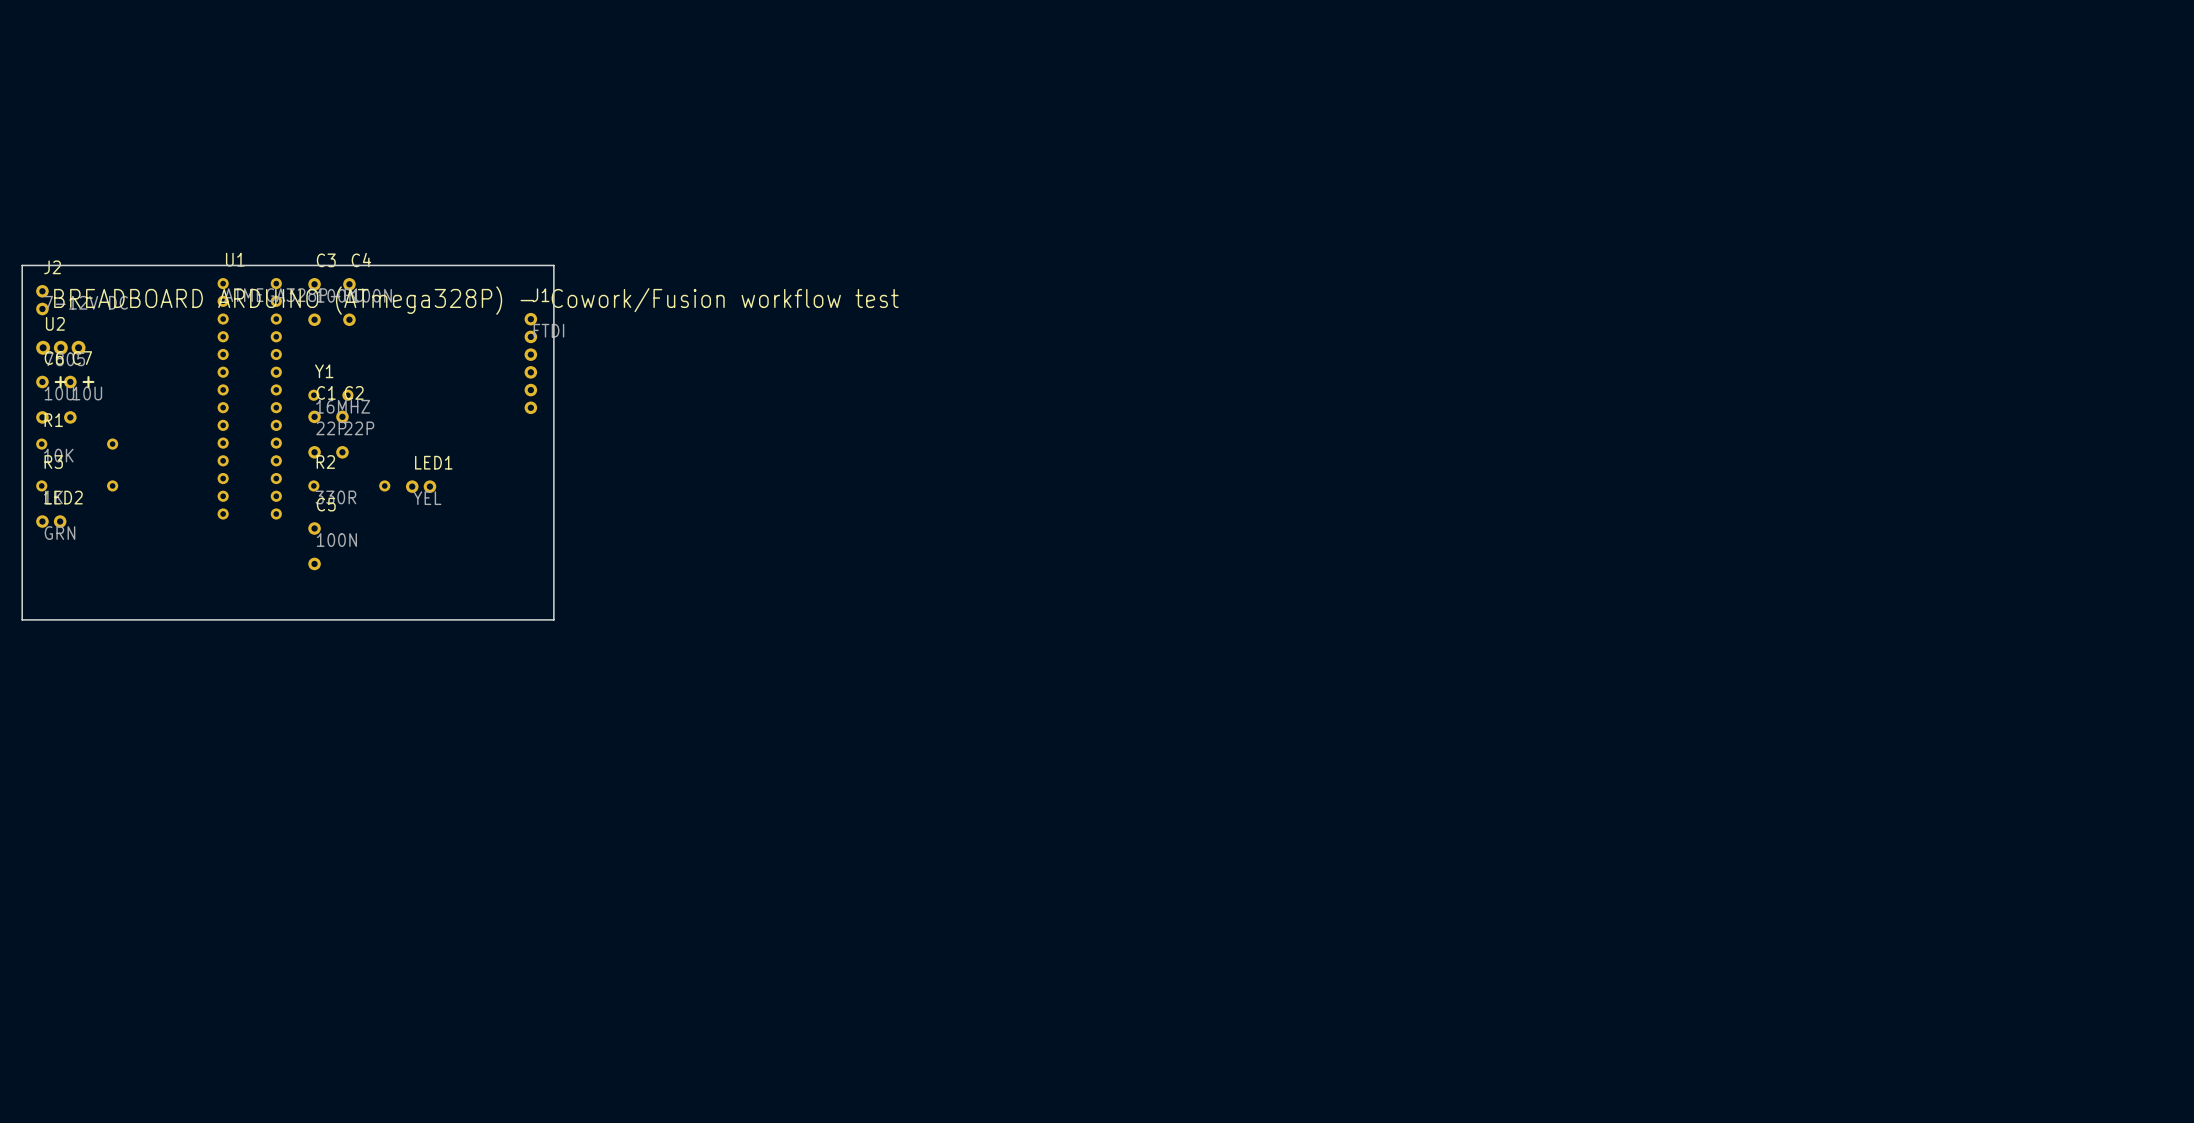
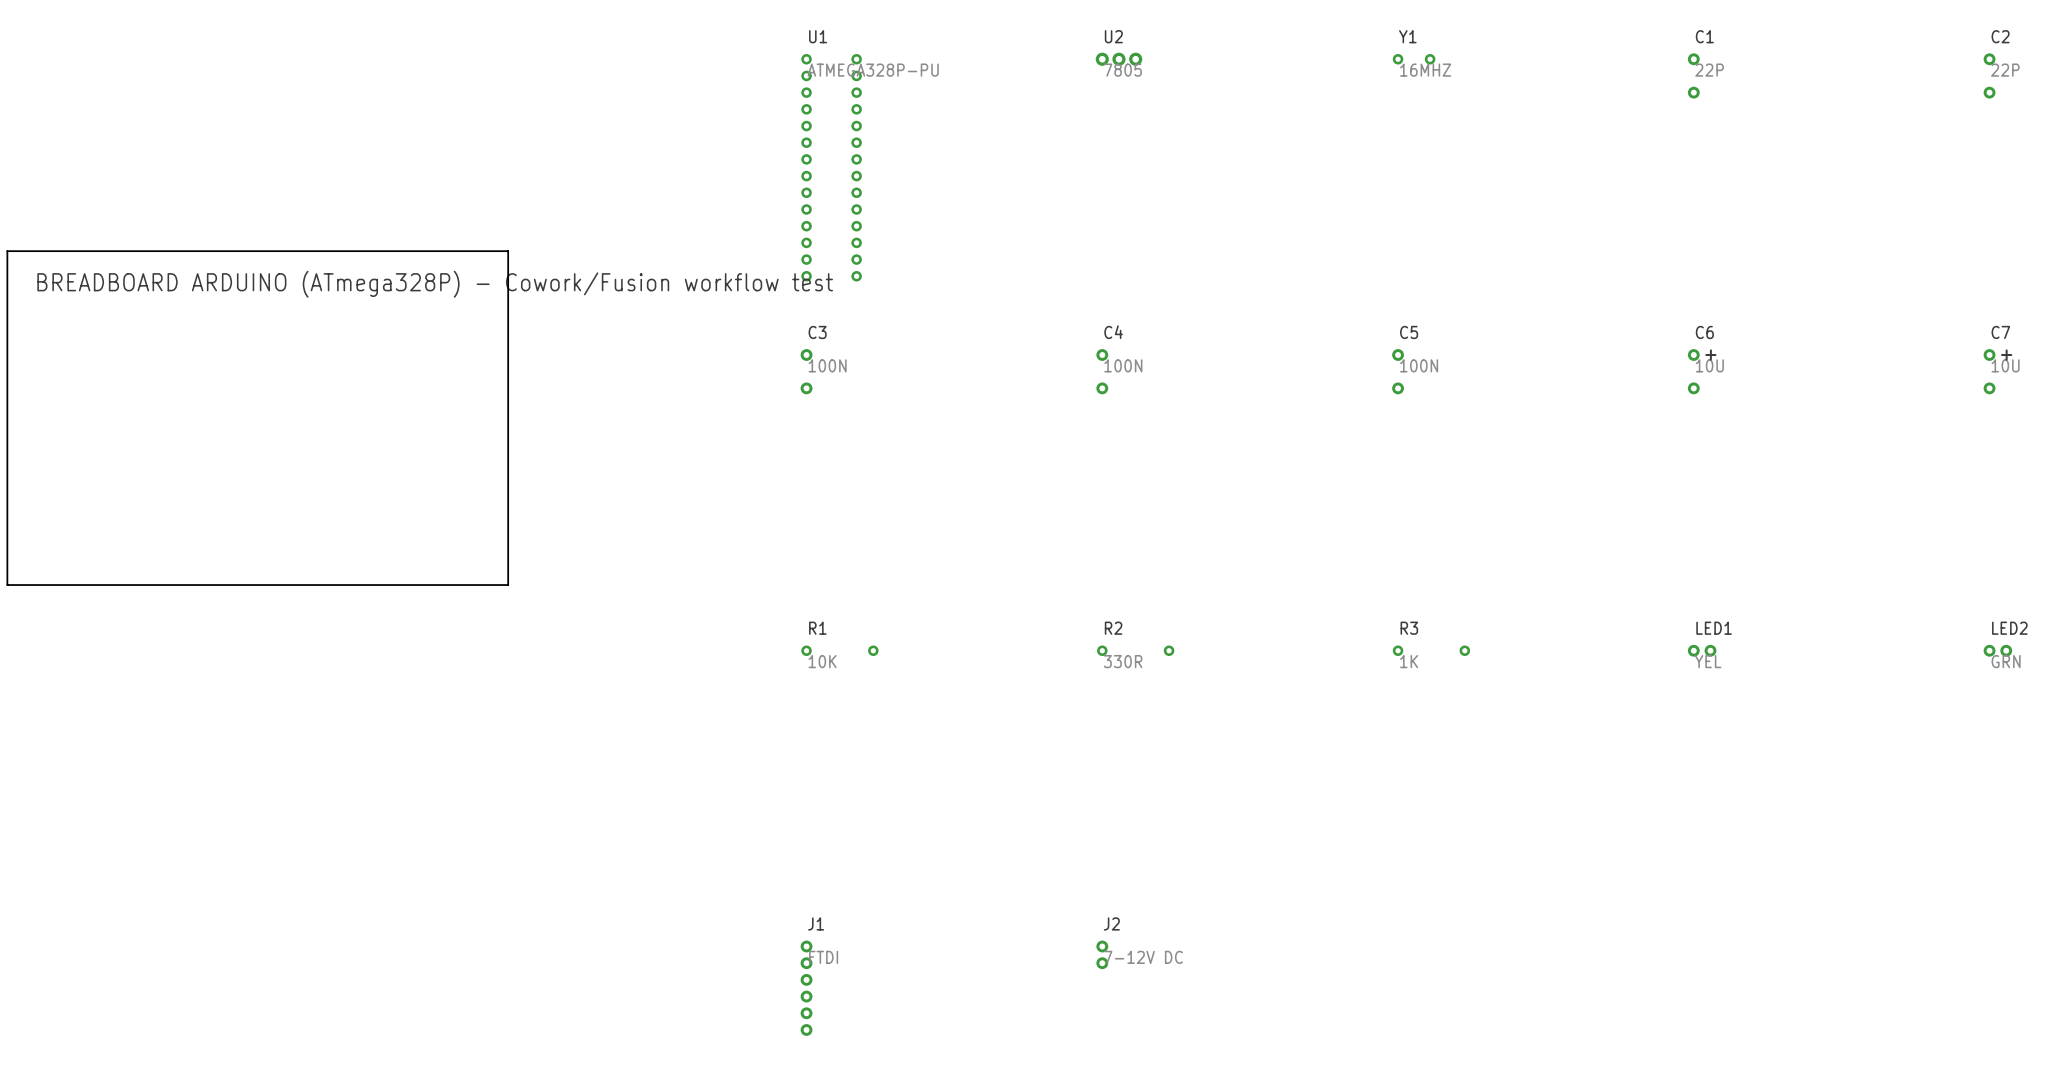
J2 position: (42, 300) -> (1102, 954)
C3 position: (314, 302) -> (806, 371)
C4 position: (349, 302) -> (1102, 371)
U2 position: (60, 347) -> (1118, 59)
J1 position: (530, 363) -> (806, 988)
Y1 position: (330, 395) -> (1414, 59)
U1 position: (249, 398) -> (831, 167)
C6 position: (51, 399) -> (1702, 371)
C7 position: (79, 399) -> (1997, 371)
C1 position: (314, 434) -> (1693, 75)
C2 position: (342, 434) -> (1989, 75)
R1 position: (77, 444) -> (839, 650)
R3 position: (77, 485) -> (1431, 650)
R2 position: (349, 485) -> (1135, 650)
LED1 position: (421, 486) -> (1702, 650)
LED2 position: (51, 521) -> (1997, 650)
C5 position: (314, 546) -> (1398, 371)

